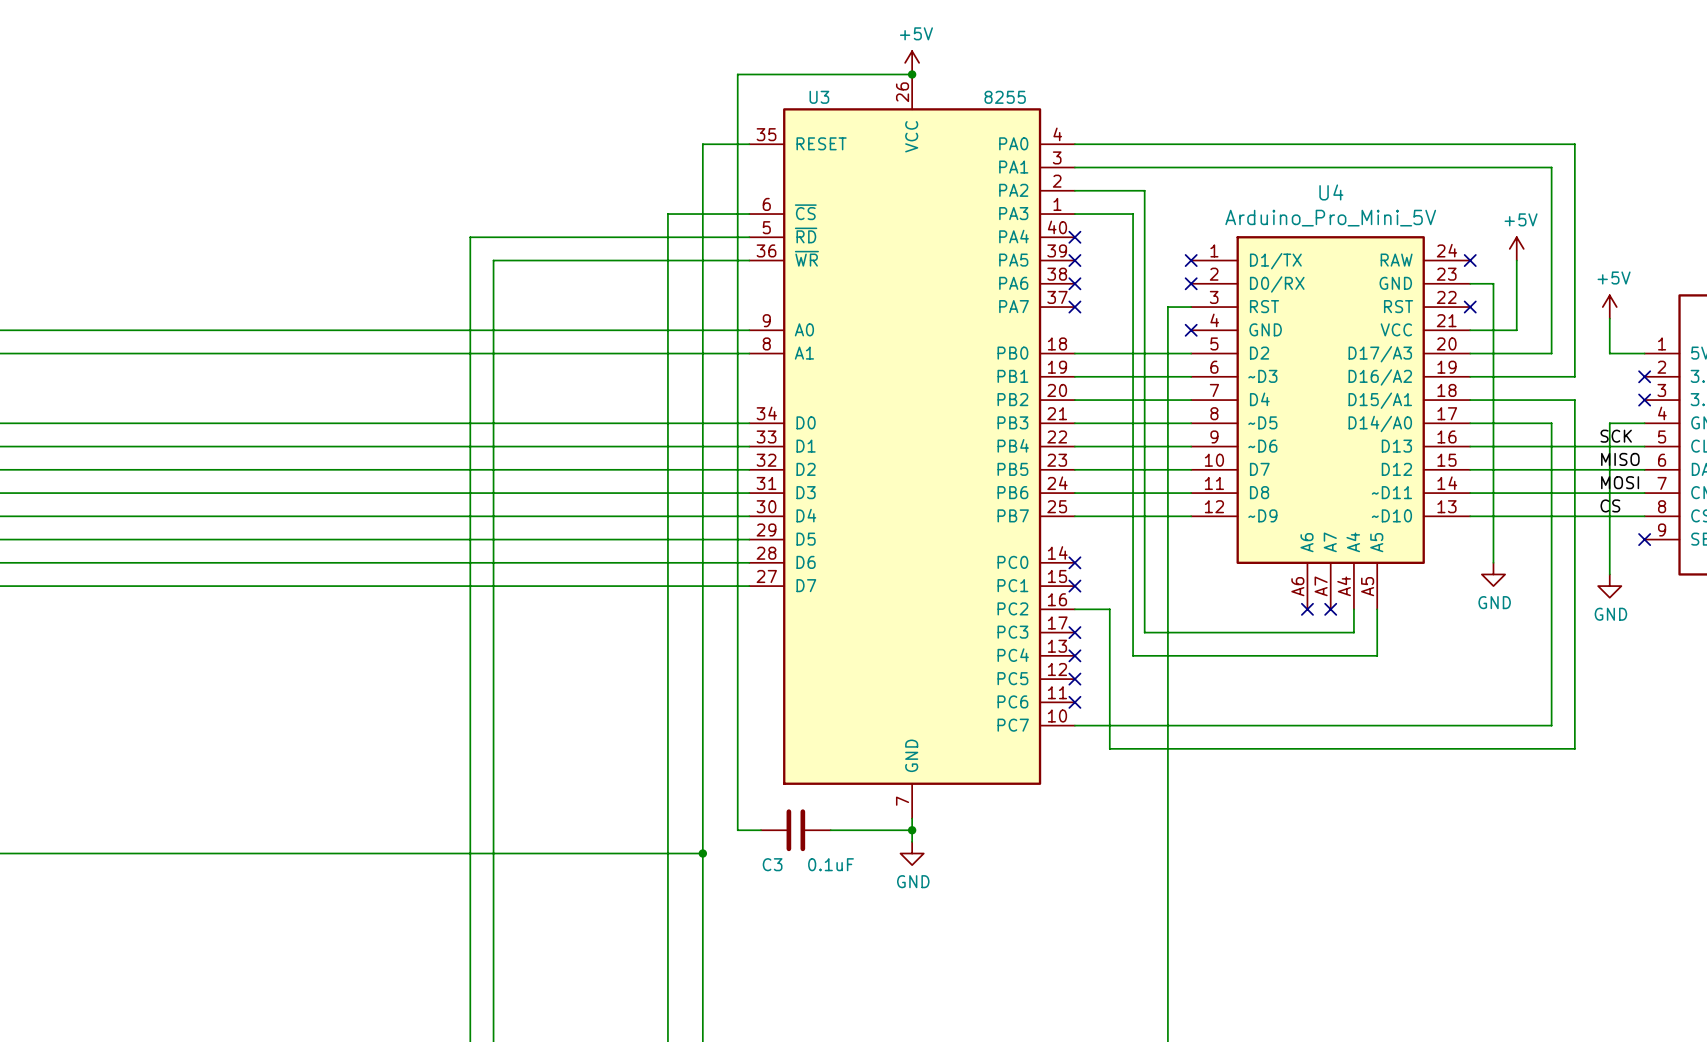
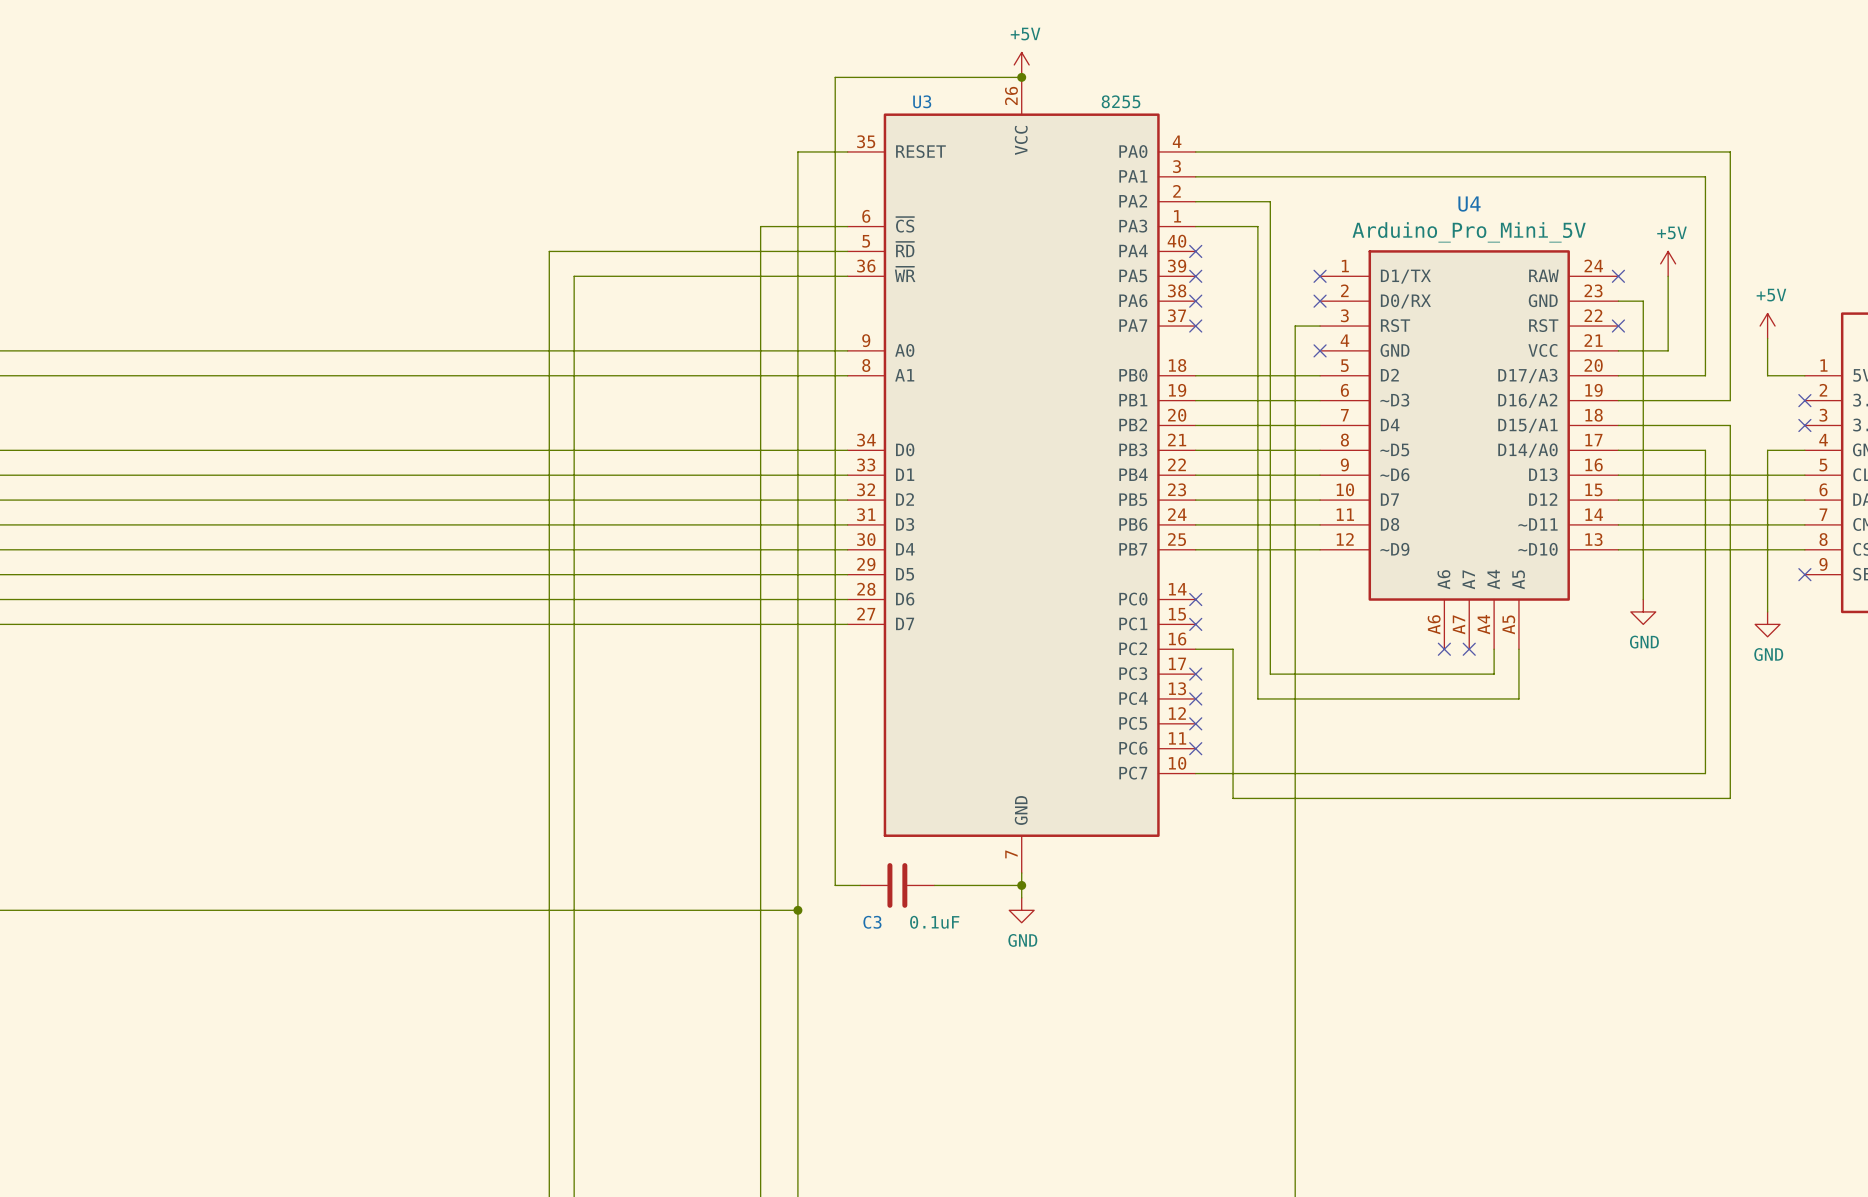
label: SCK (1616, 436) -> none
label: MISO (1620, 459) -> none
label: MOSI (1620, 482) -> none
label: CS (1610, 505) -> none

